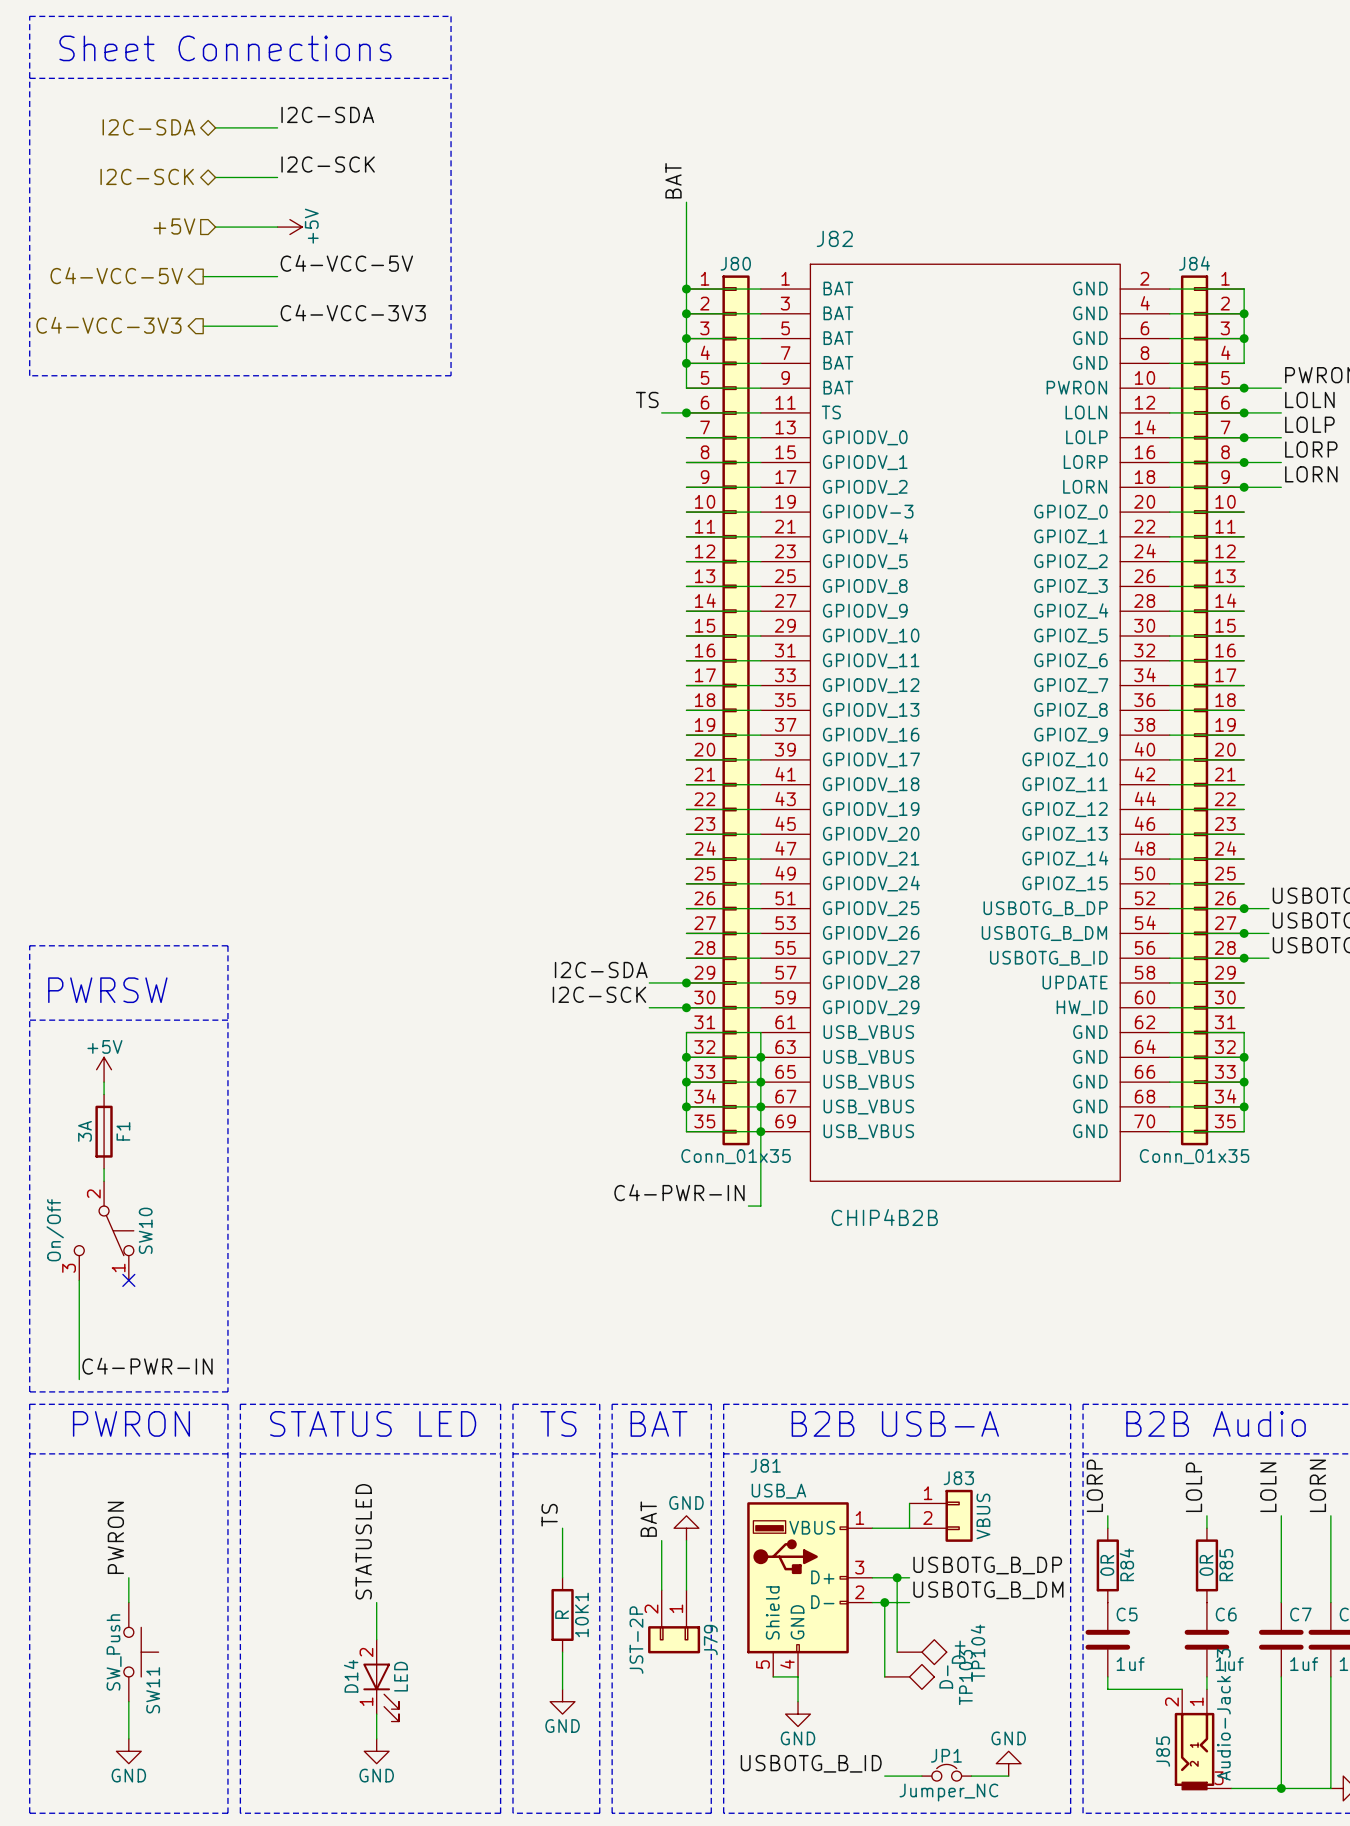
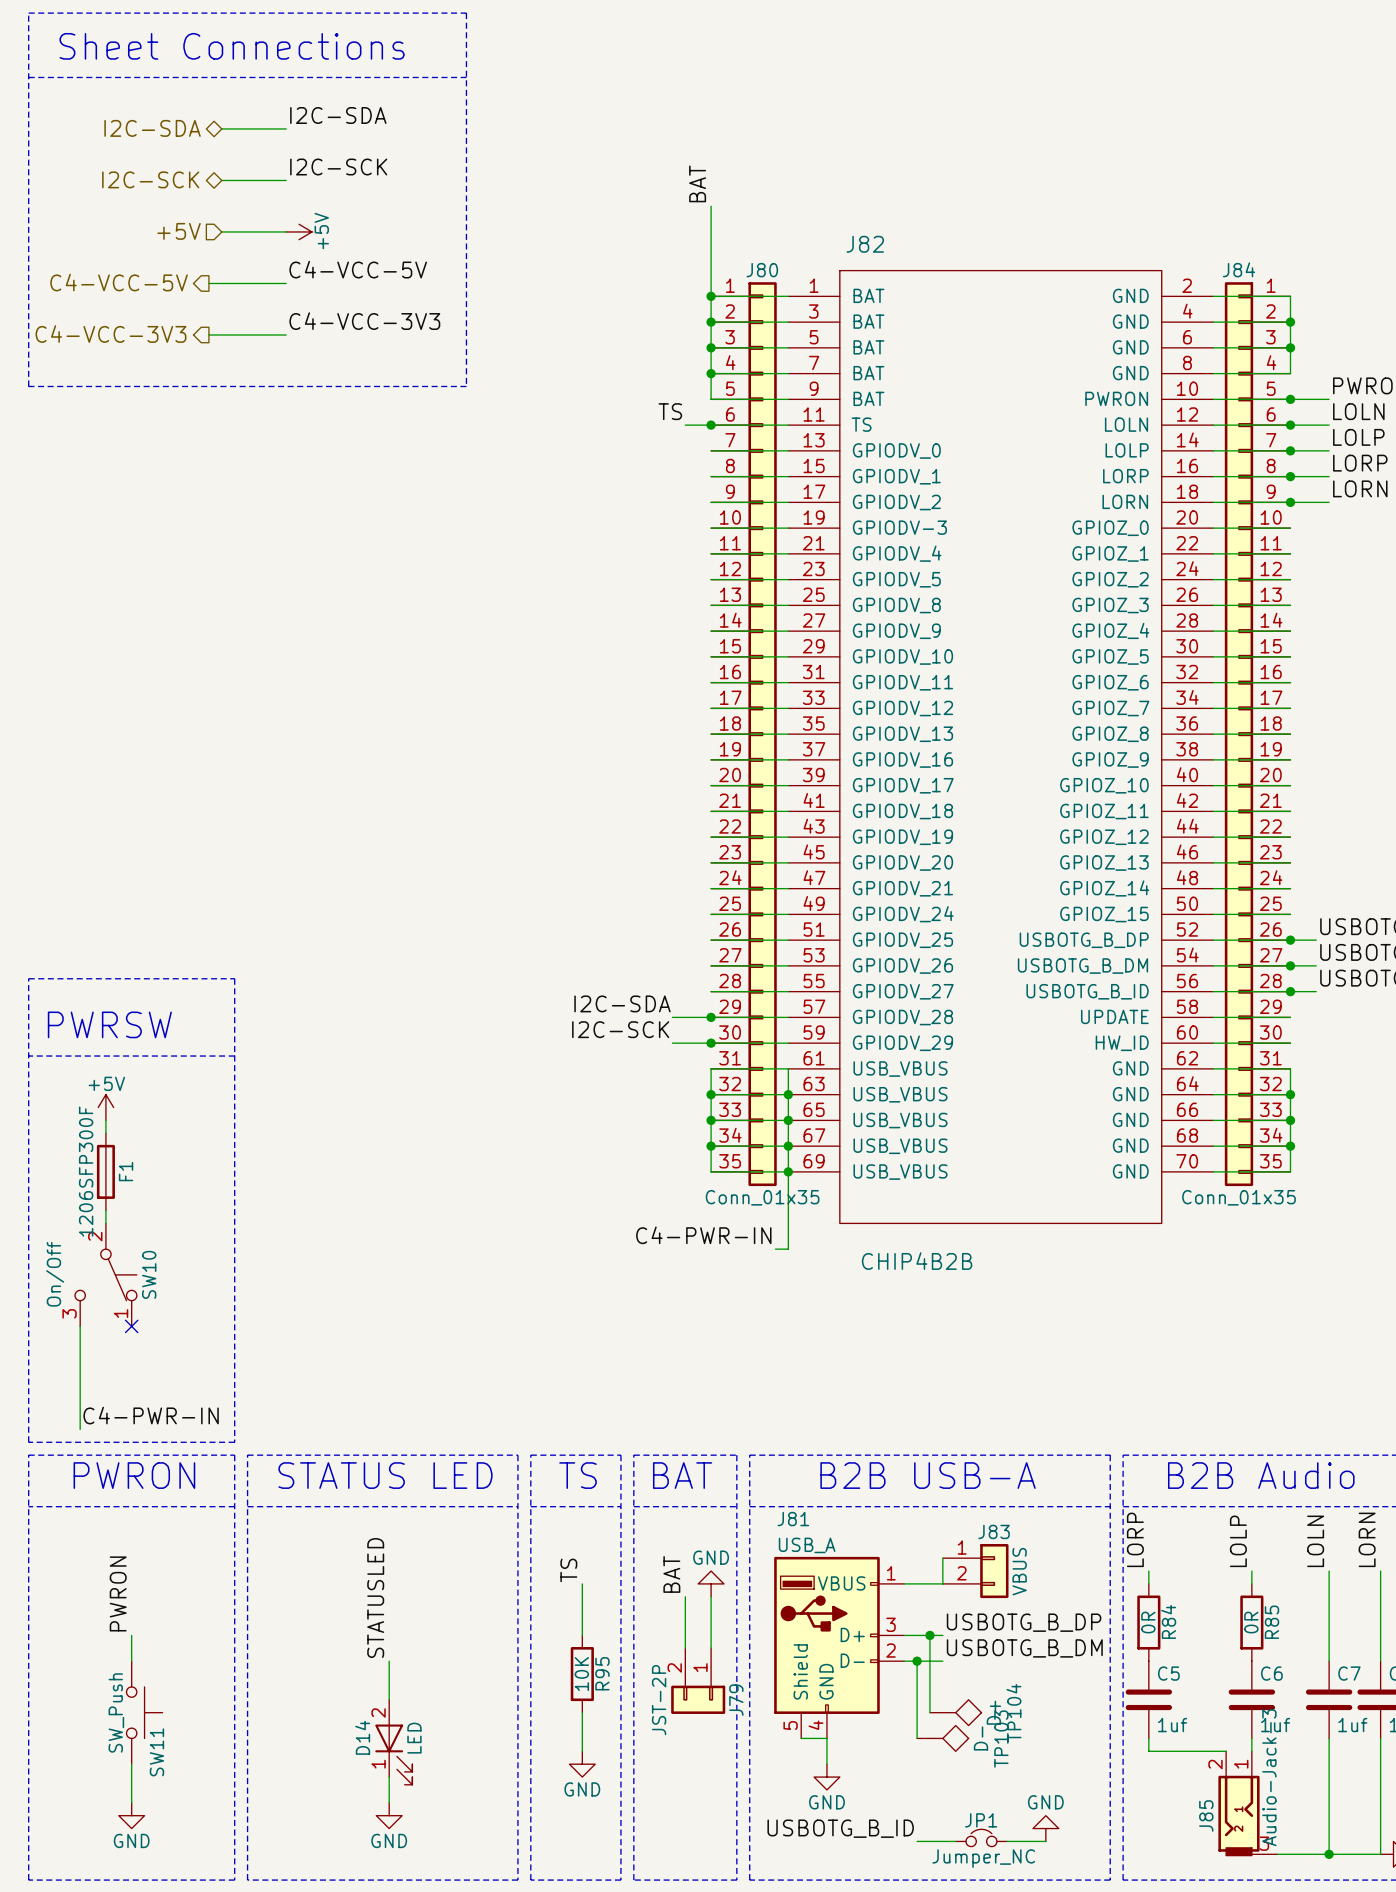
F1 value: 3A (85, 1131) -> 1206SFP300F (86, 1171)
10K1 value: R (562, 1614) -> 10K (581, 1674)
10K1 name: 10K1 (581, 1614) -> R95 (602, 1673)

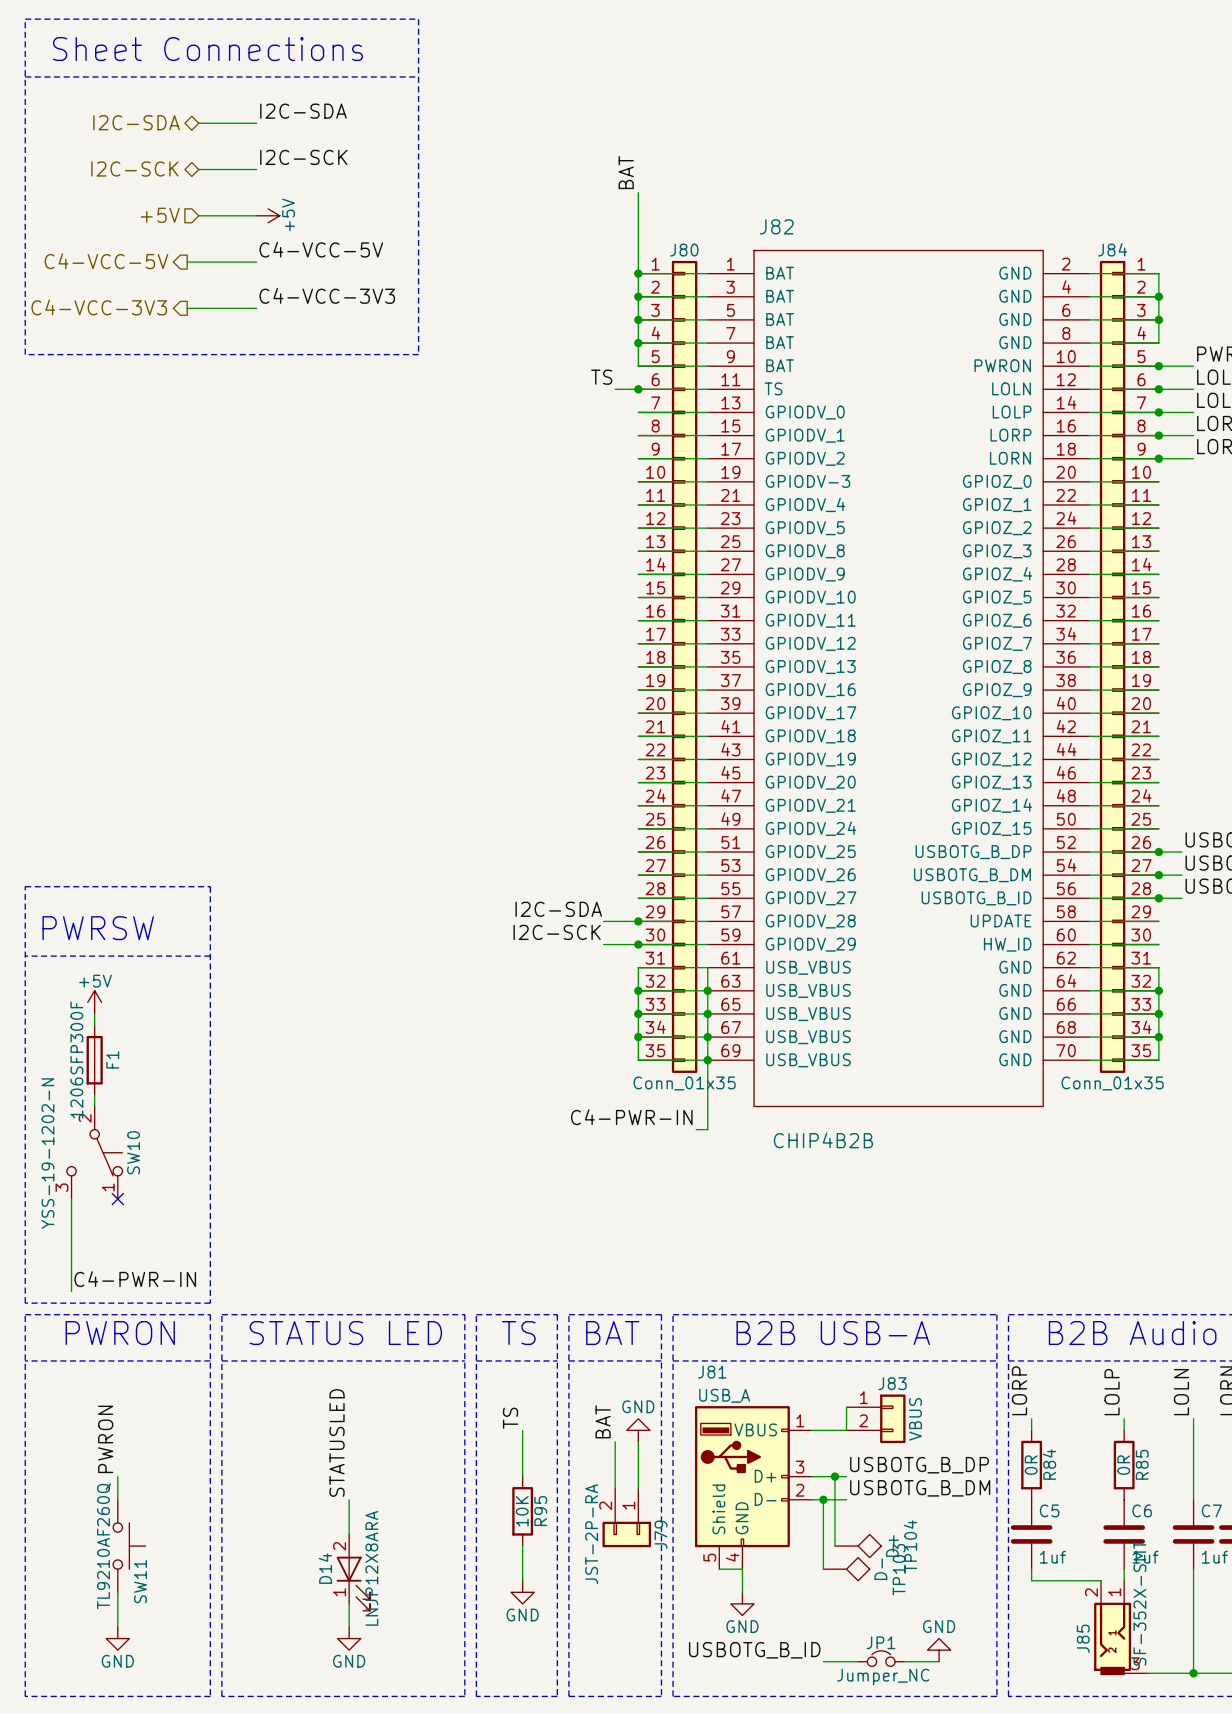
SW10 value: On/Off (55, 1274) -> YSS-19-1202-N (47, 1153)
J79 value: JST-2P (659, 1700) -> JST-2P-RA (591, 1534)
SW11 value: SW_Push (116, 1712) -> TL9210AF260Q (104, 1546)
D14 value: LED (414, 1738) -> LNJP12X8ARA (371, 1568)
J85 value: Audio-Jack-3 (1269, 1777) -> SF-352X-SMT (1139, 1603)

